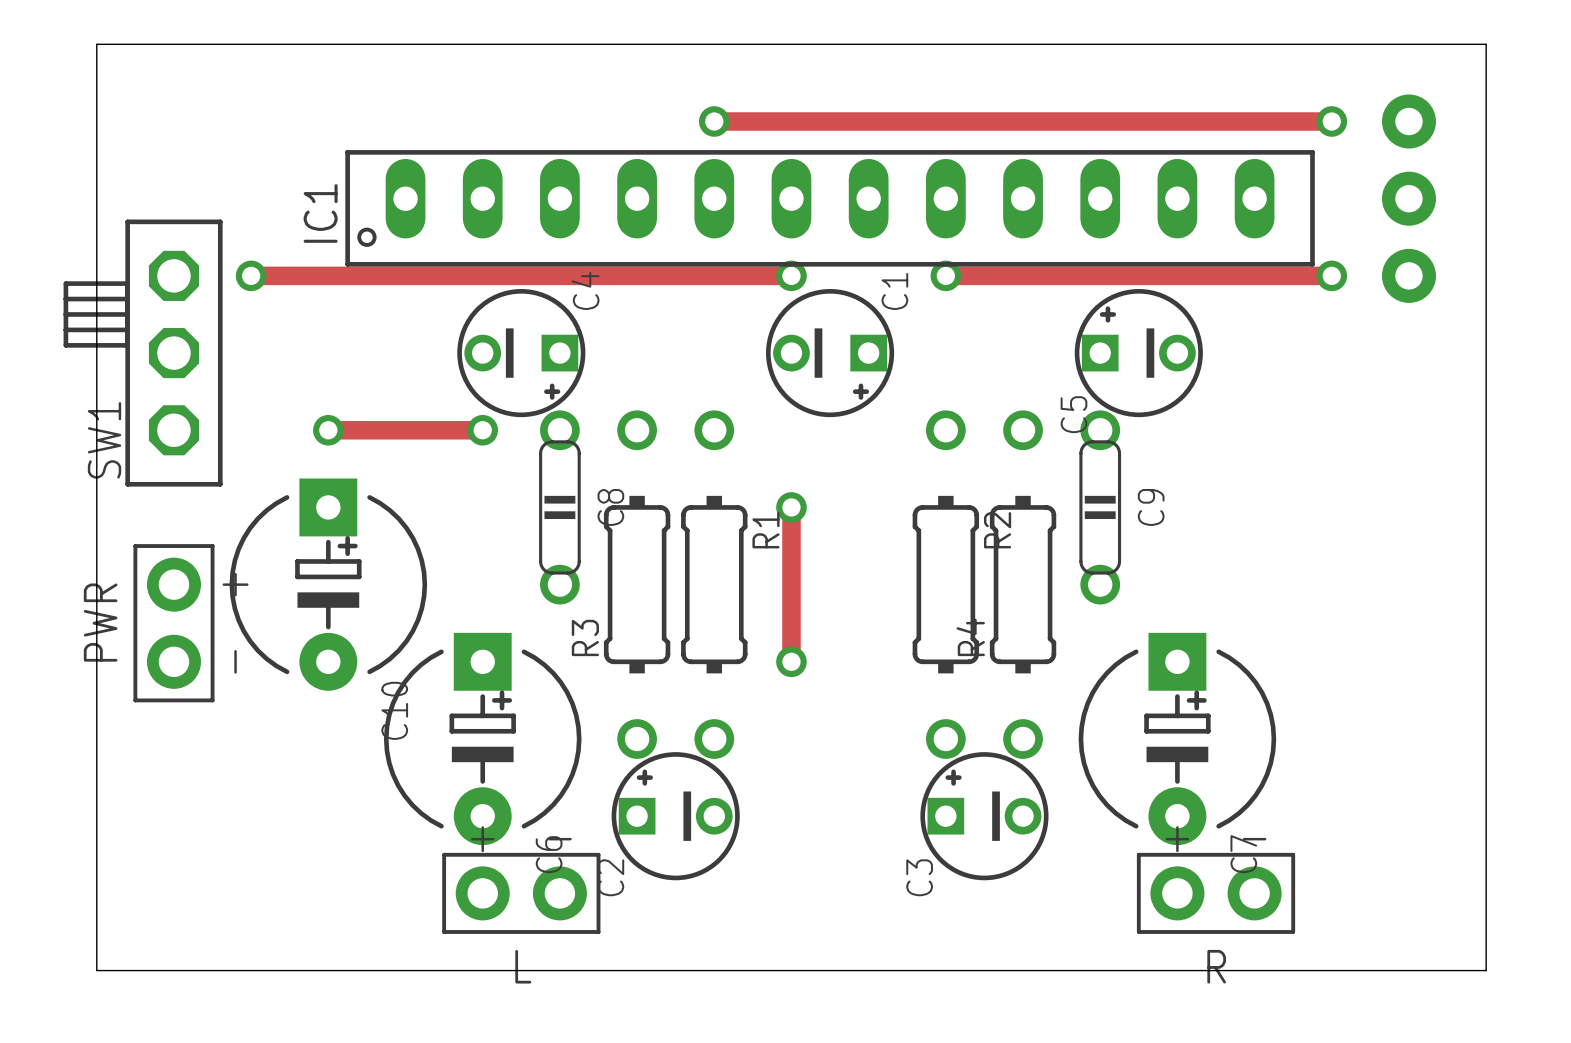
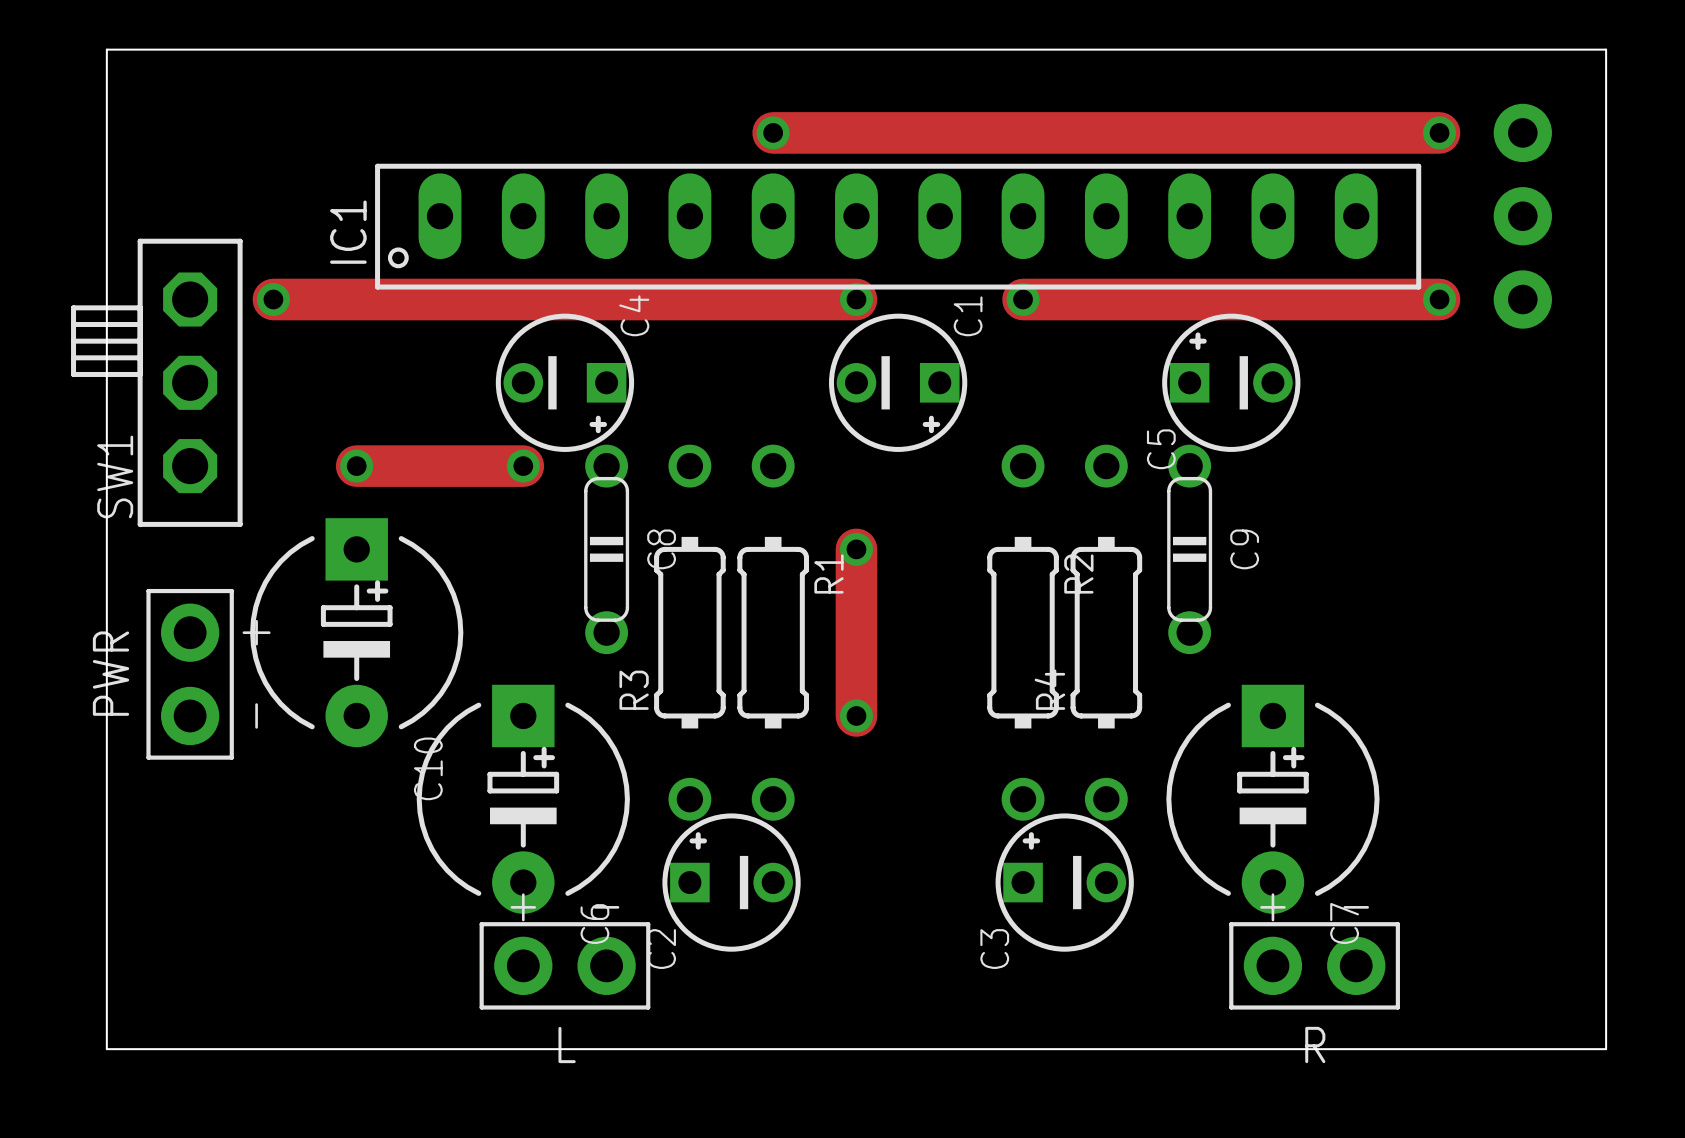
track width: thin (714, 121) (1331, 121) -> thick (773, 132) (1439, 132)
track width: thin (251, 275) (791, 275) -> thick (273, 299) (856, 299)
track width: thin (945, 275) (1331, 275) -> thick (1023, 299) (1439, 299)
track width: thin (328, 430) (482, 430) -> thick (356, 466) (523, 466)
track width: thin (791, 507) (791, 661) -> thick (856, 549) (856, 715)

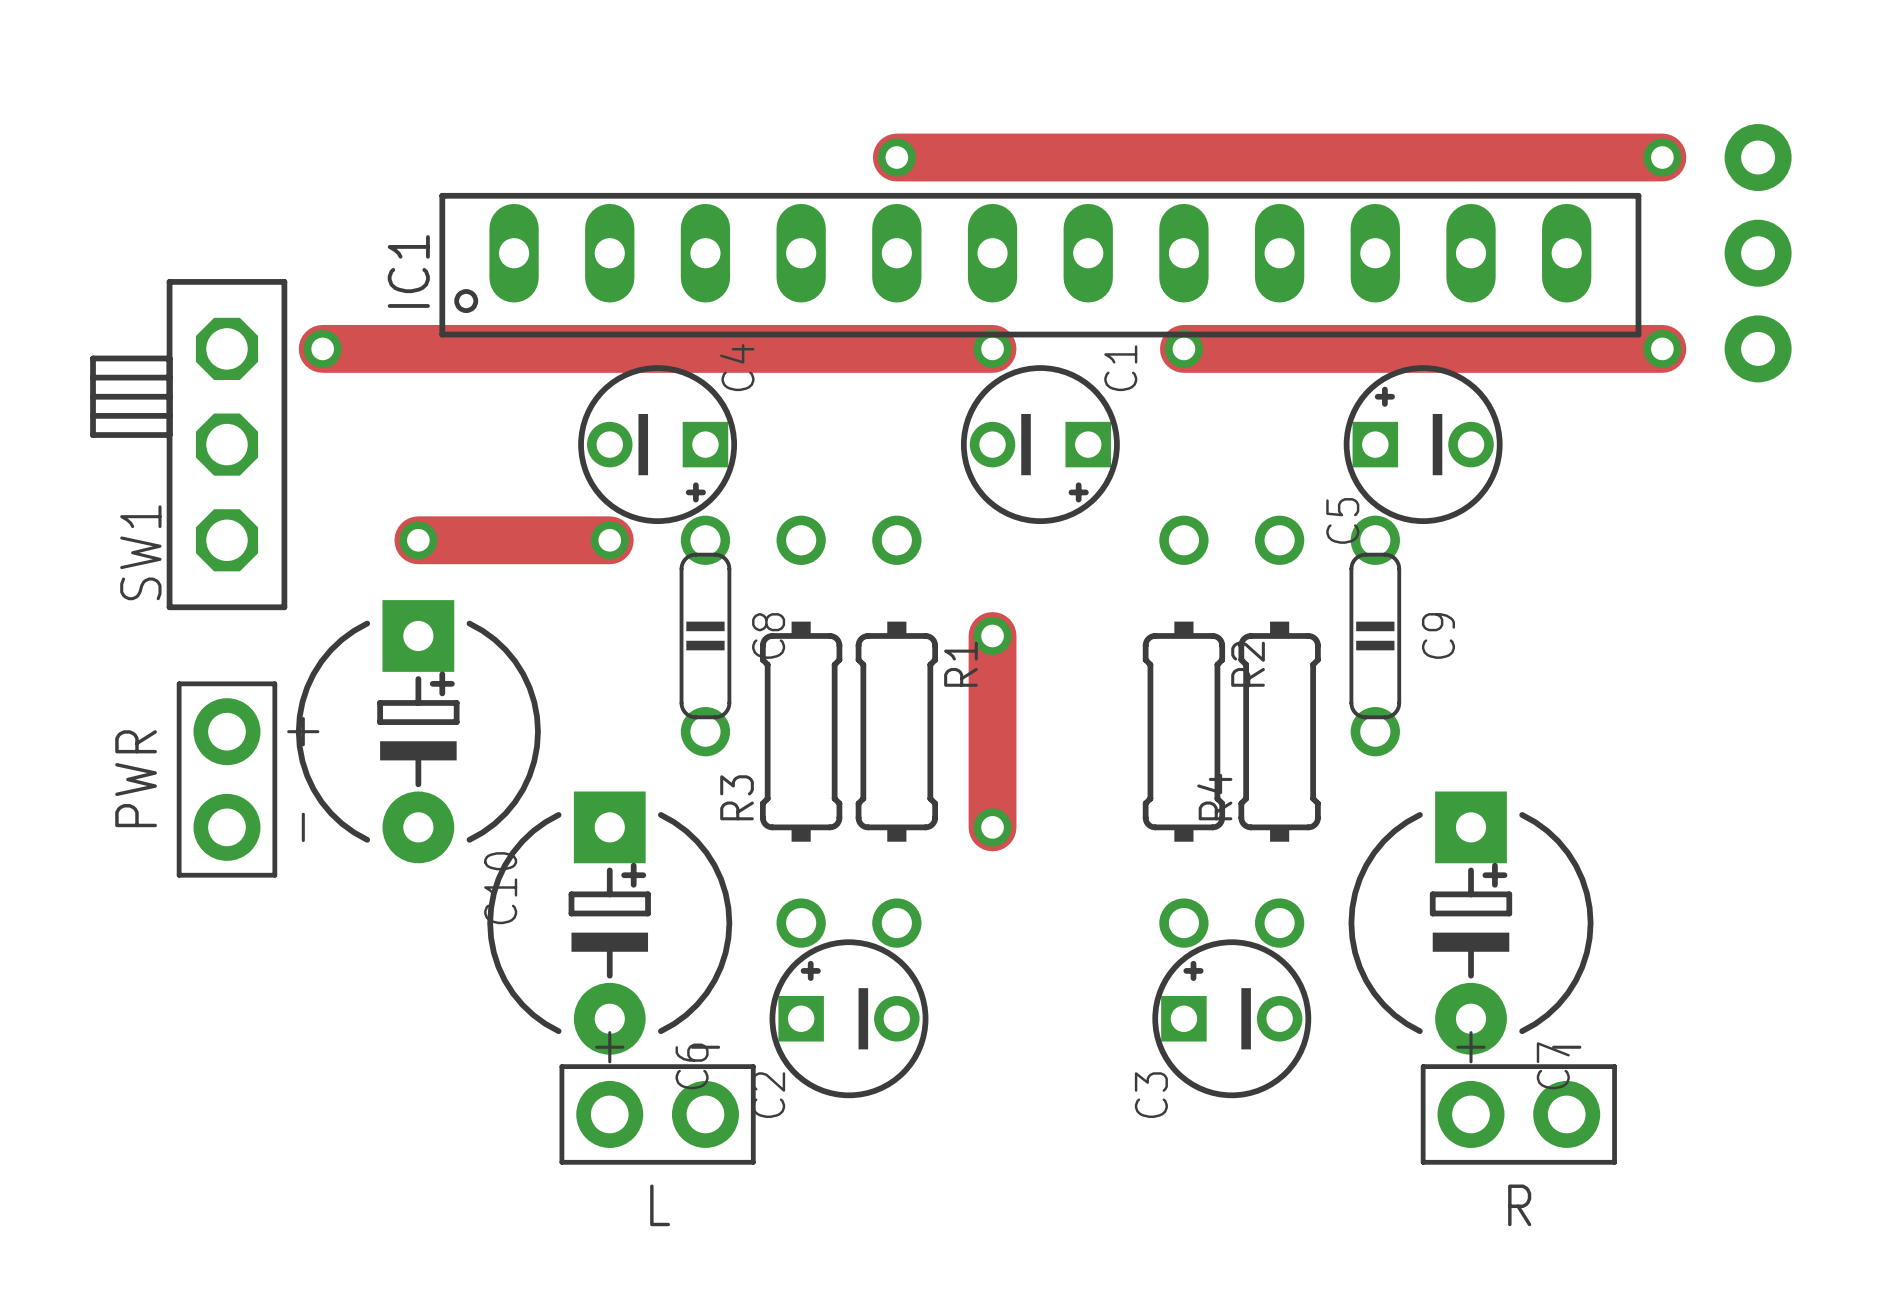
board edge: (106, 49) (1606, 49) (1606, 1049) (106, 1049) (106, 49) -> none

